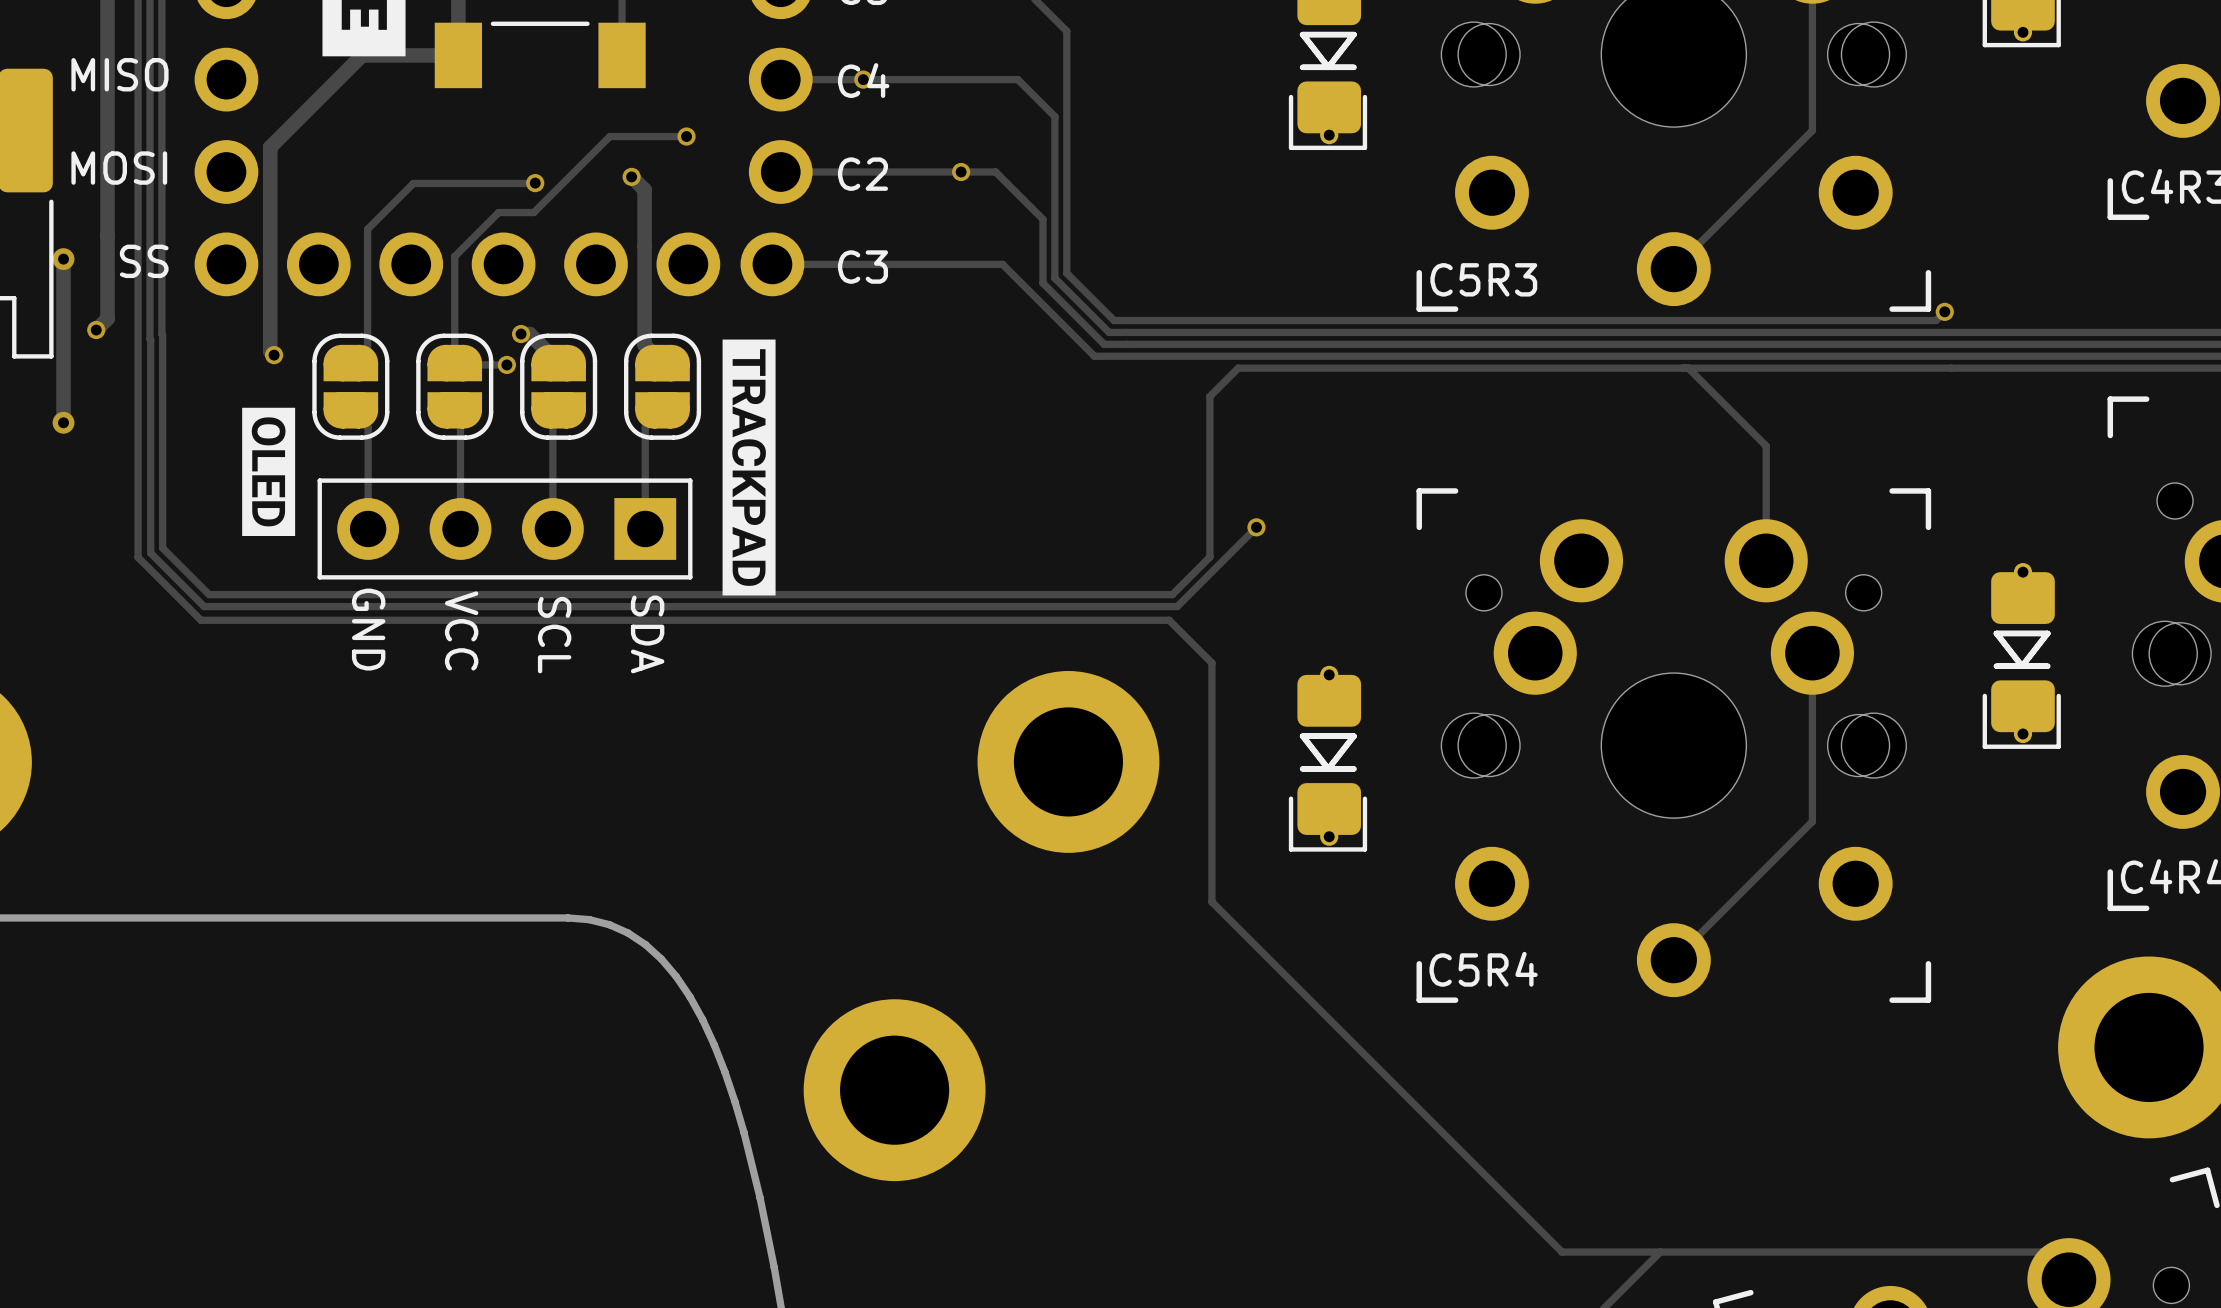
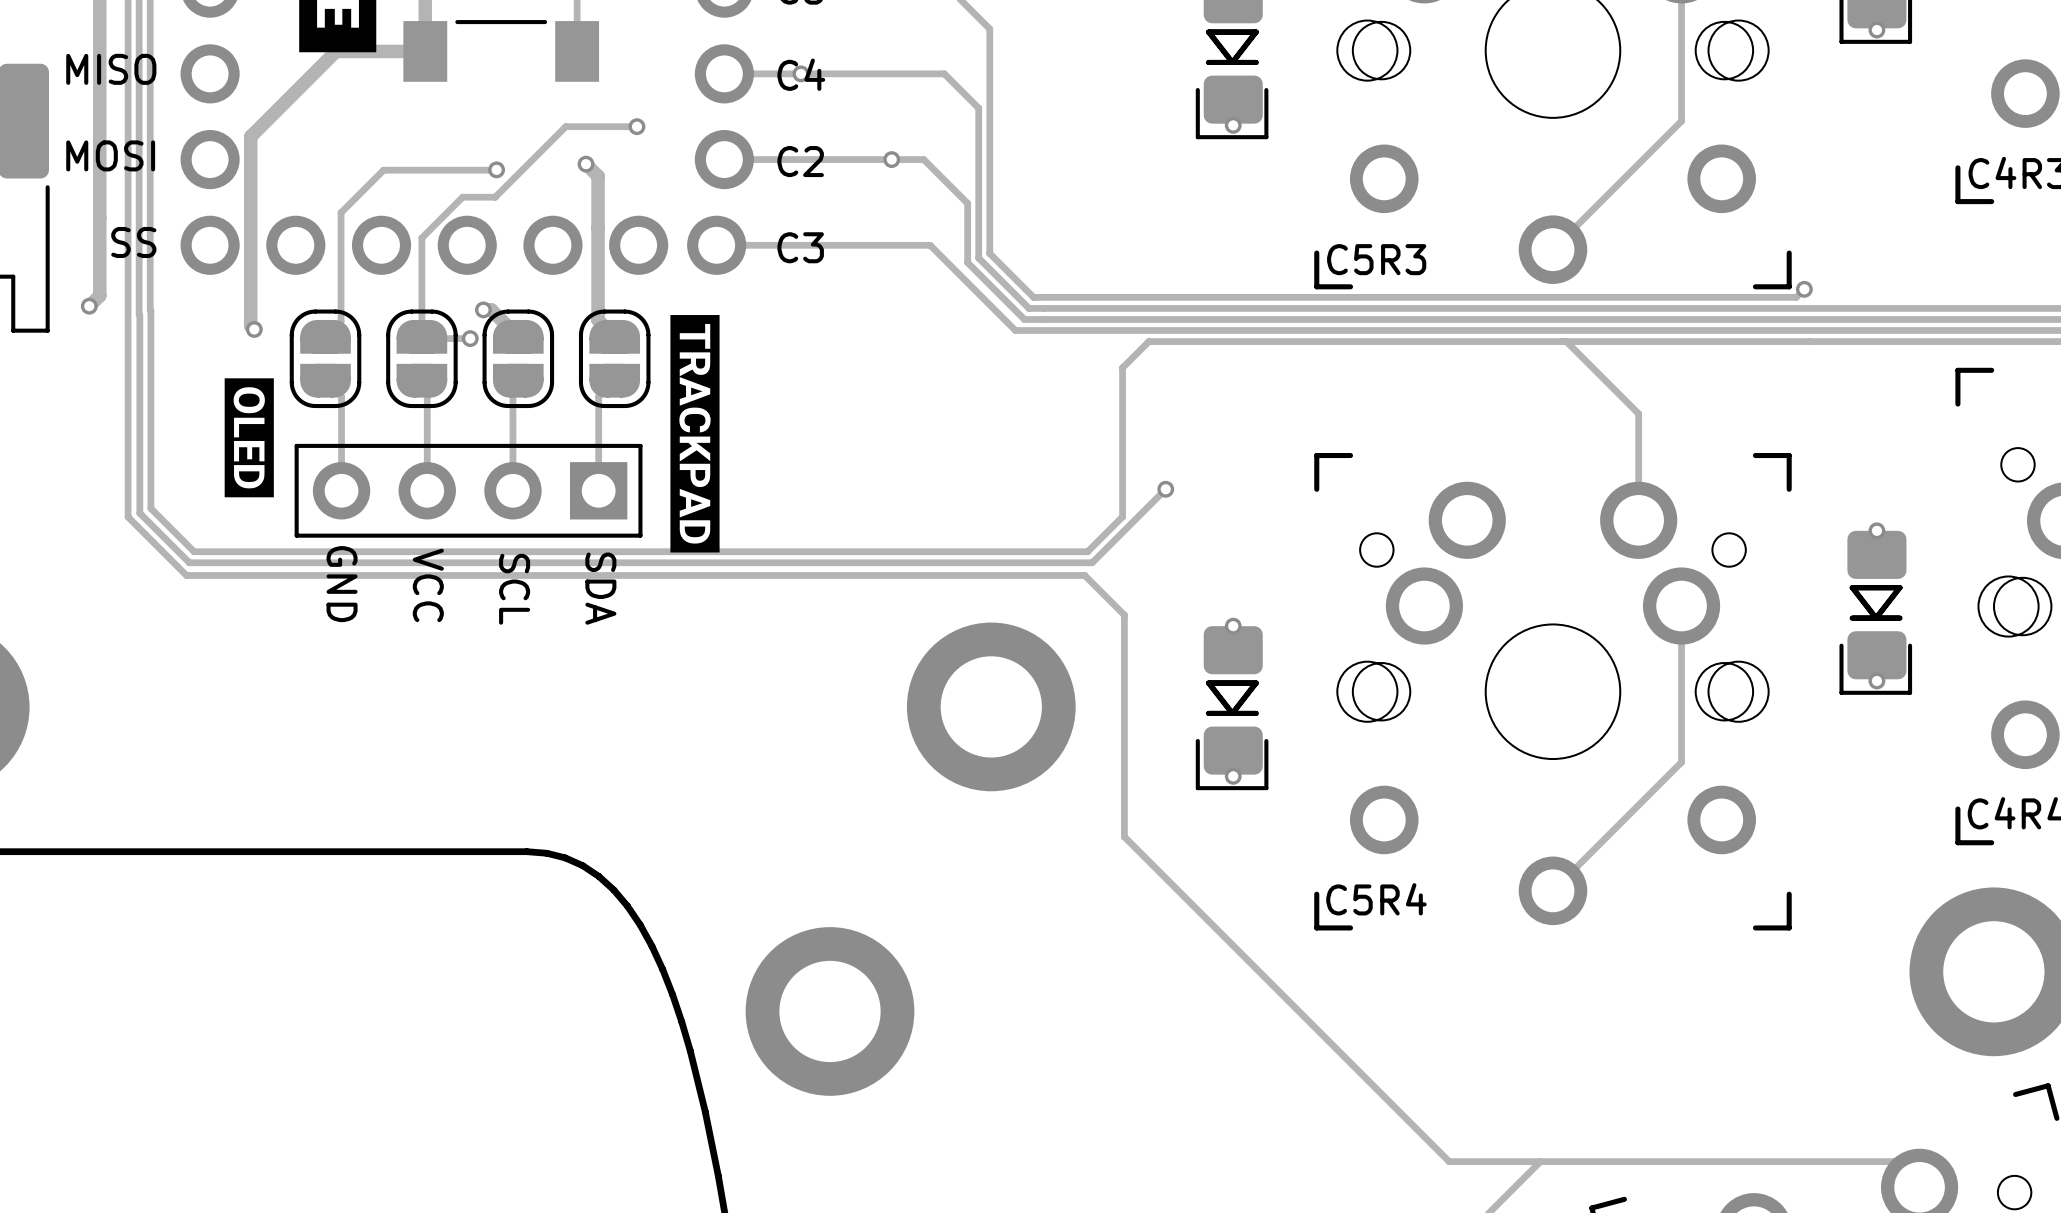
track: (63, 259) (63, 422) -> none
via: (63, 259) -> none
via: (63, 422) -> none

